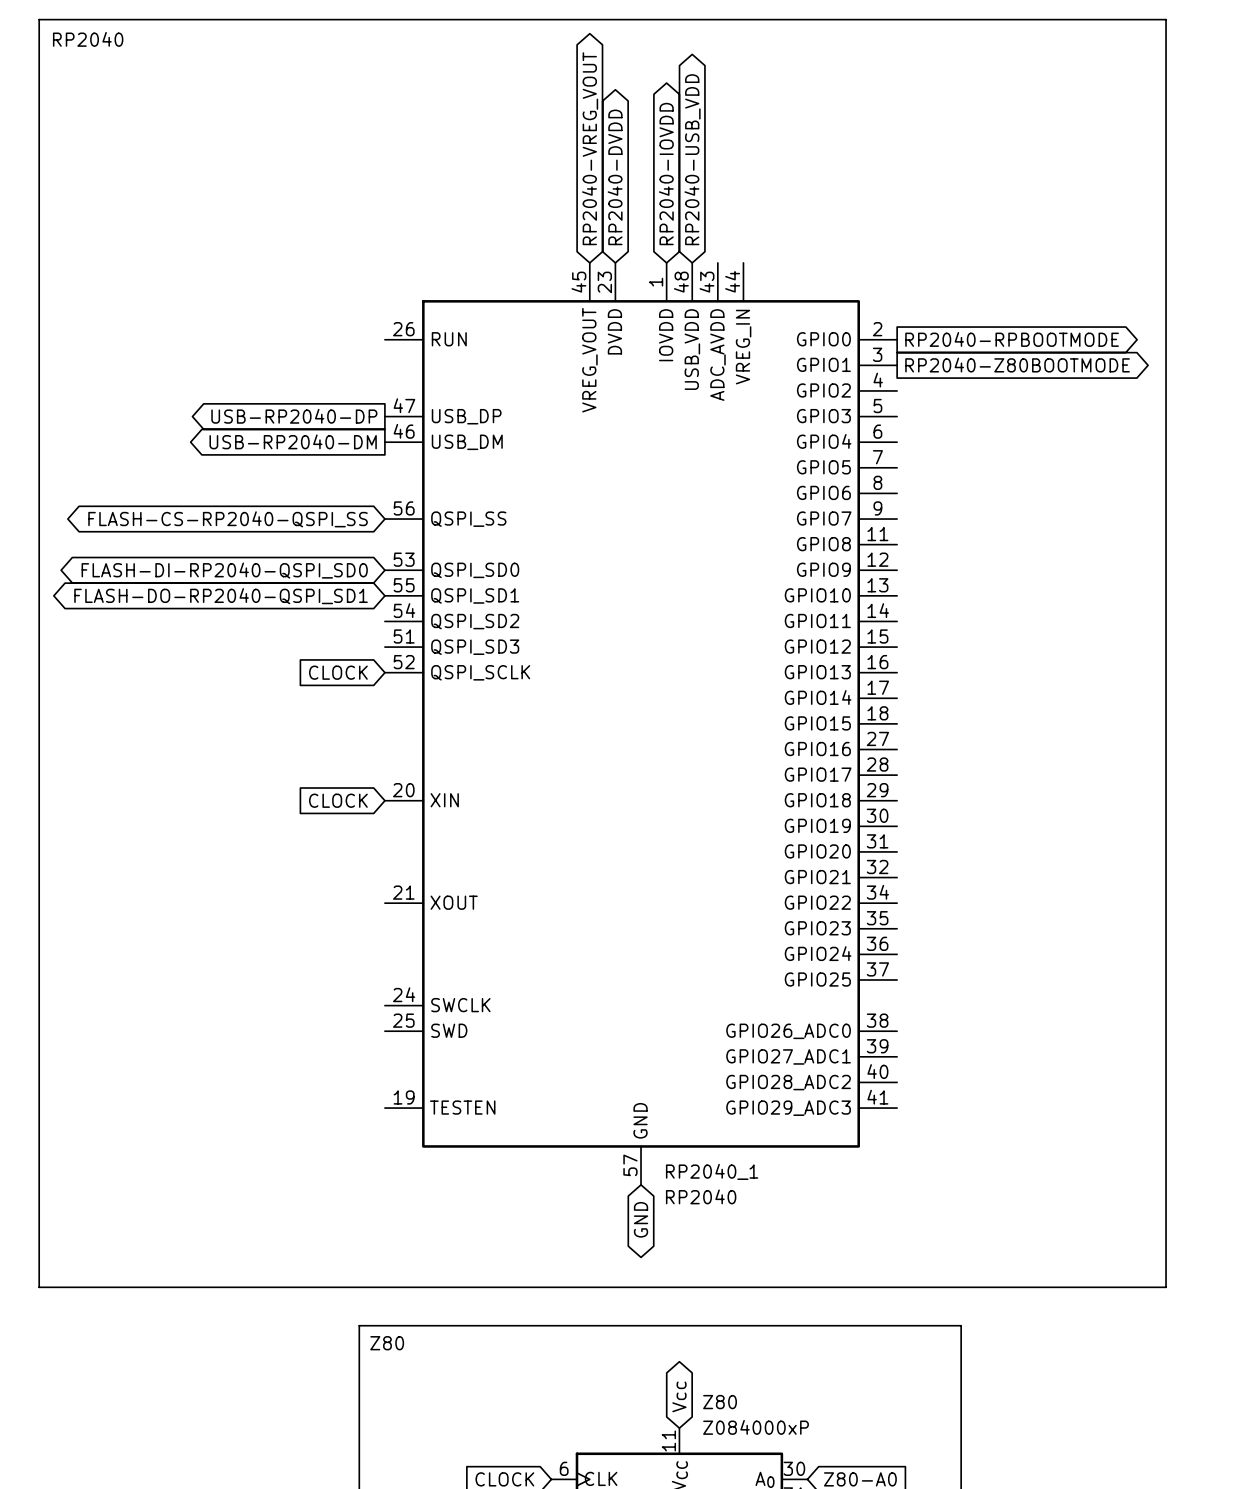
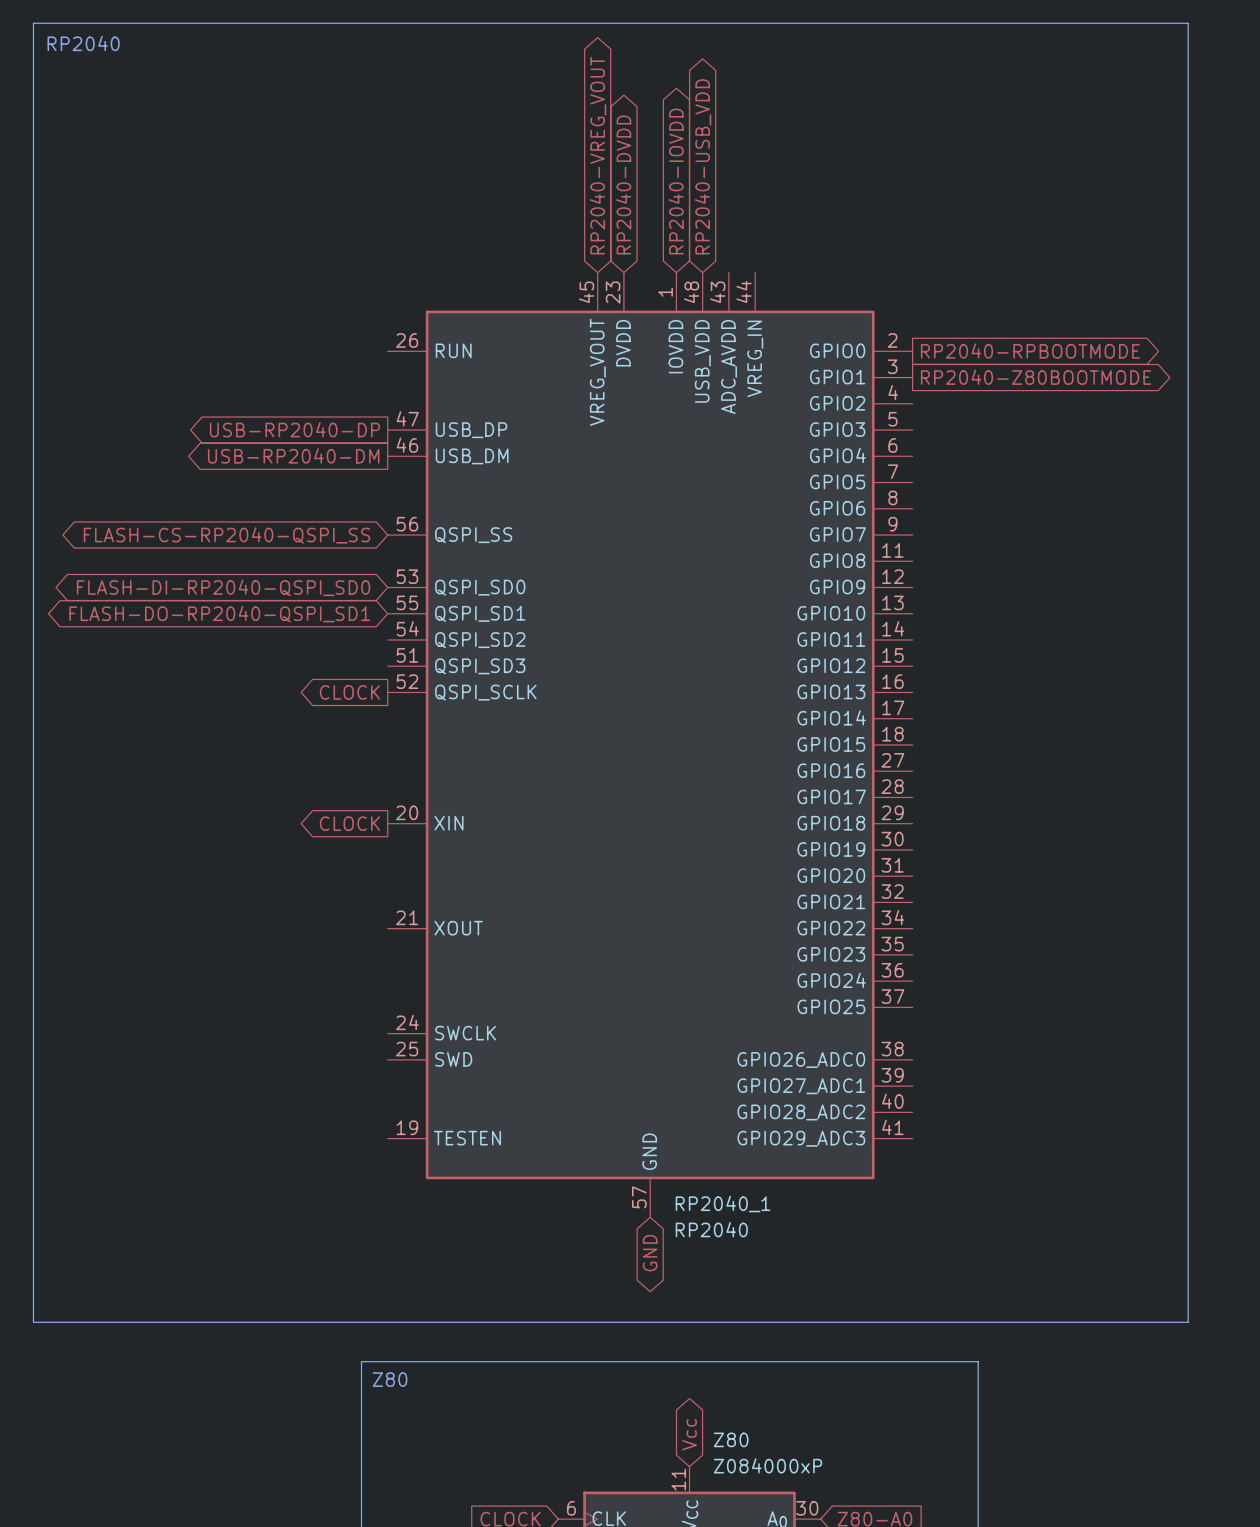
global label shape: input (338, 672) -> output (349, 692)
global label shape: input (338, 800) -> output (349, 823)

